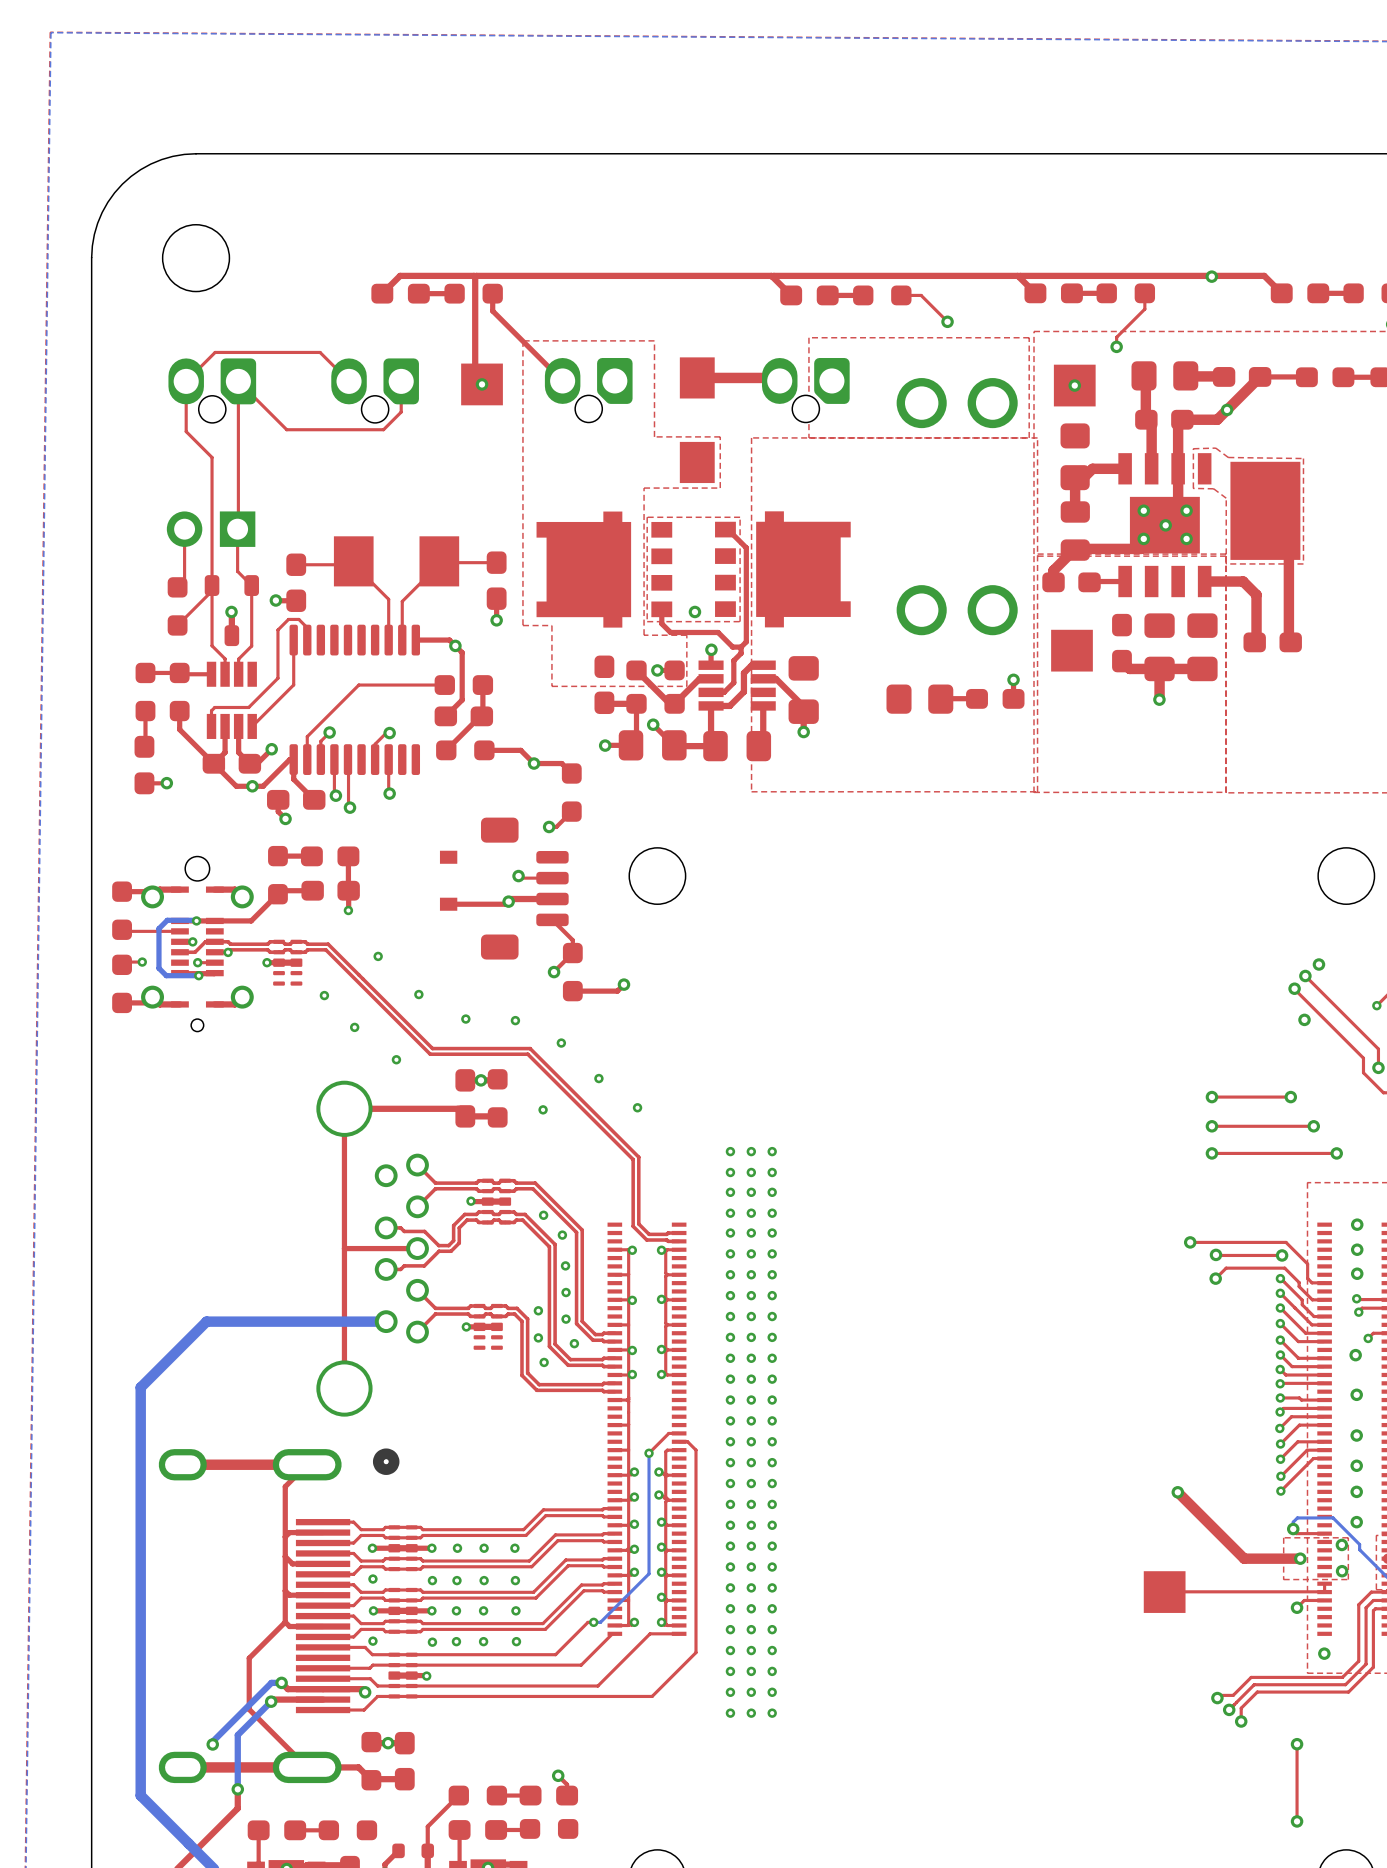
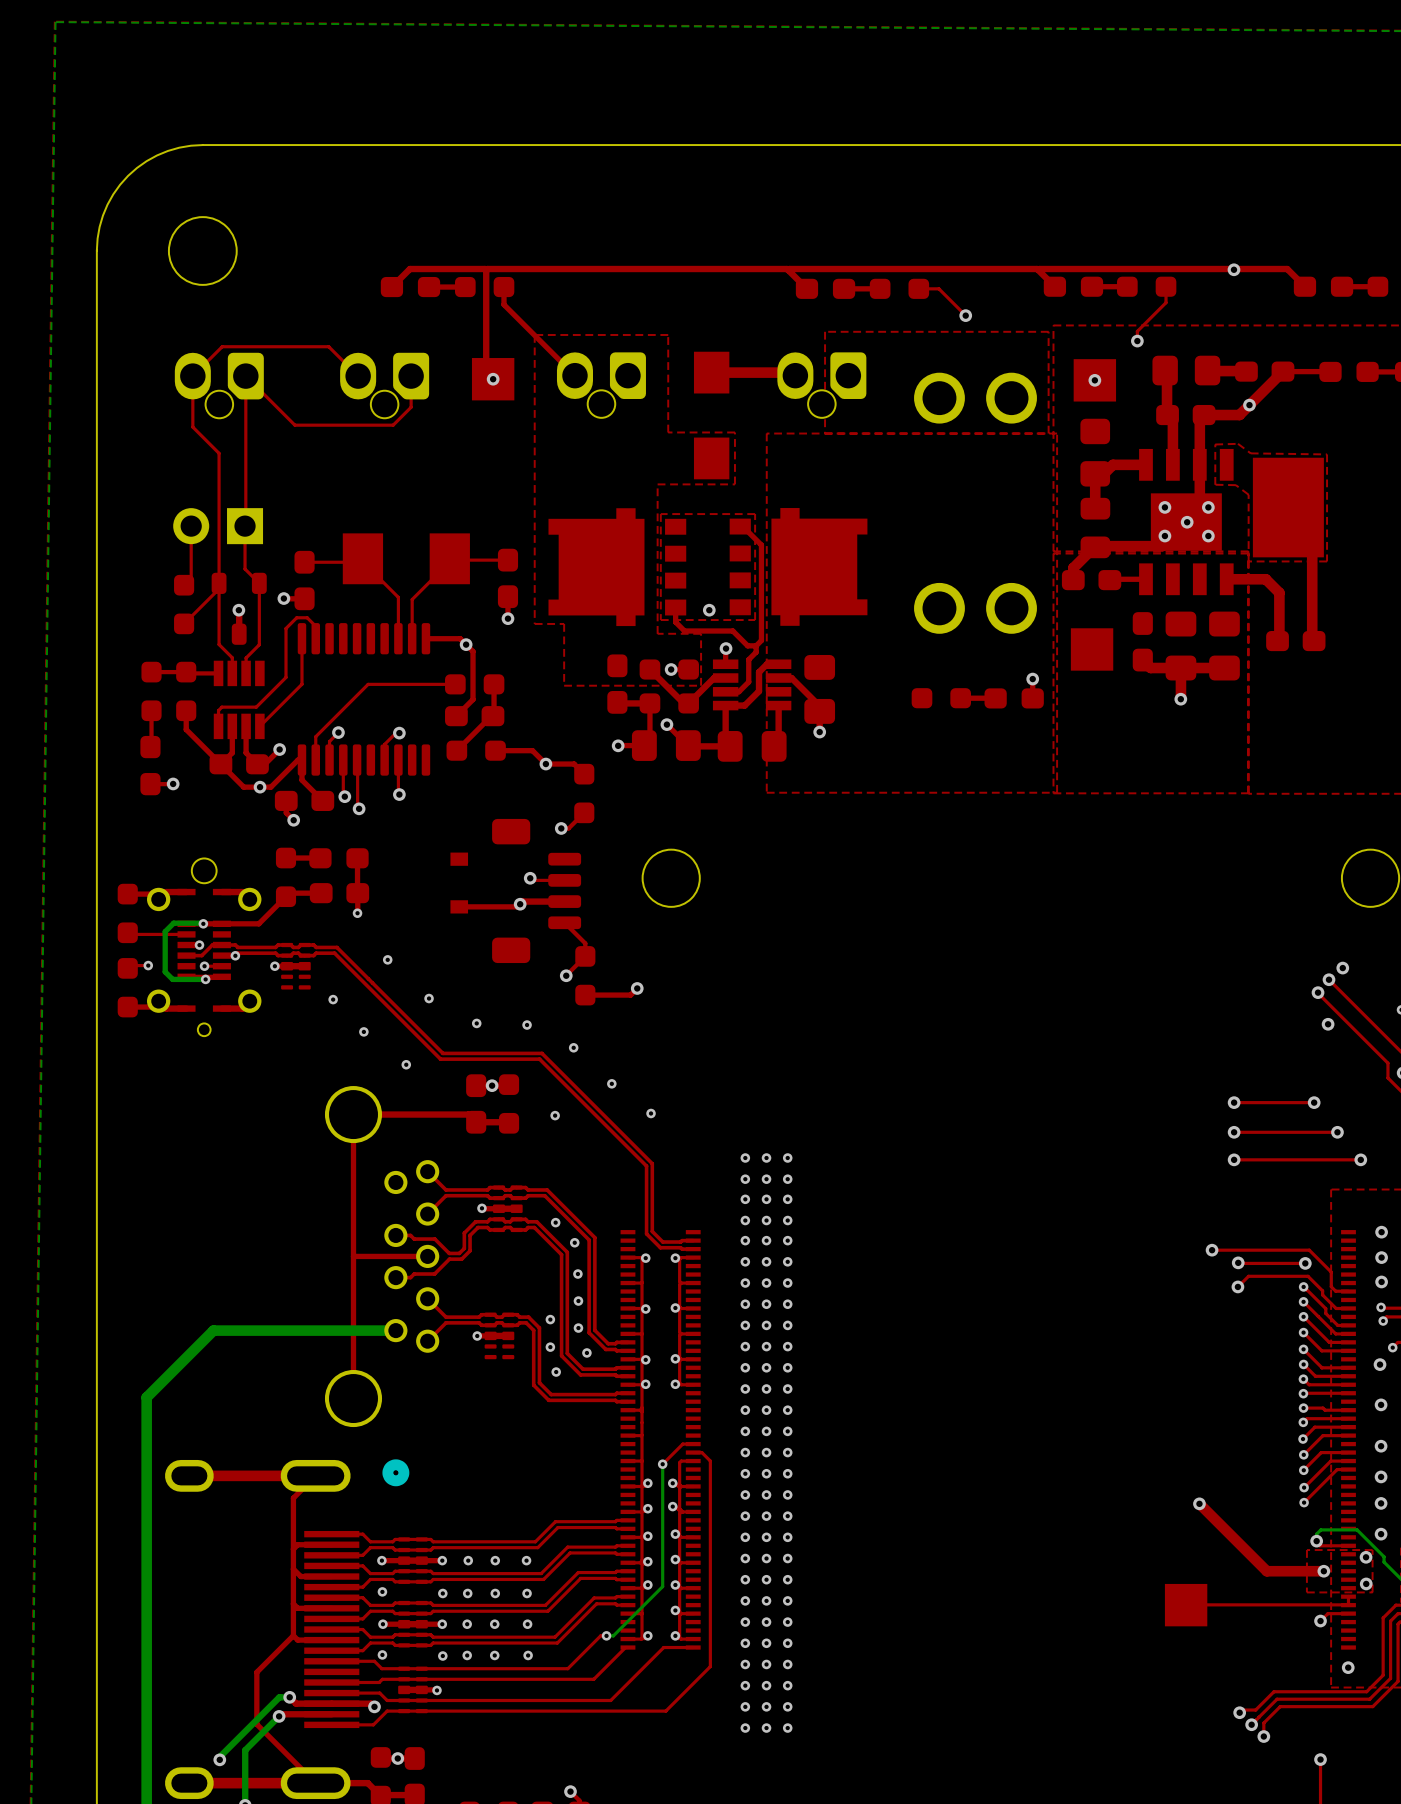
part footprint: [886, 684, 954, 714] -> [911, 688, 971, 709]

